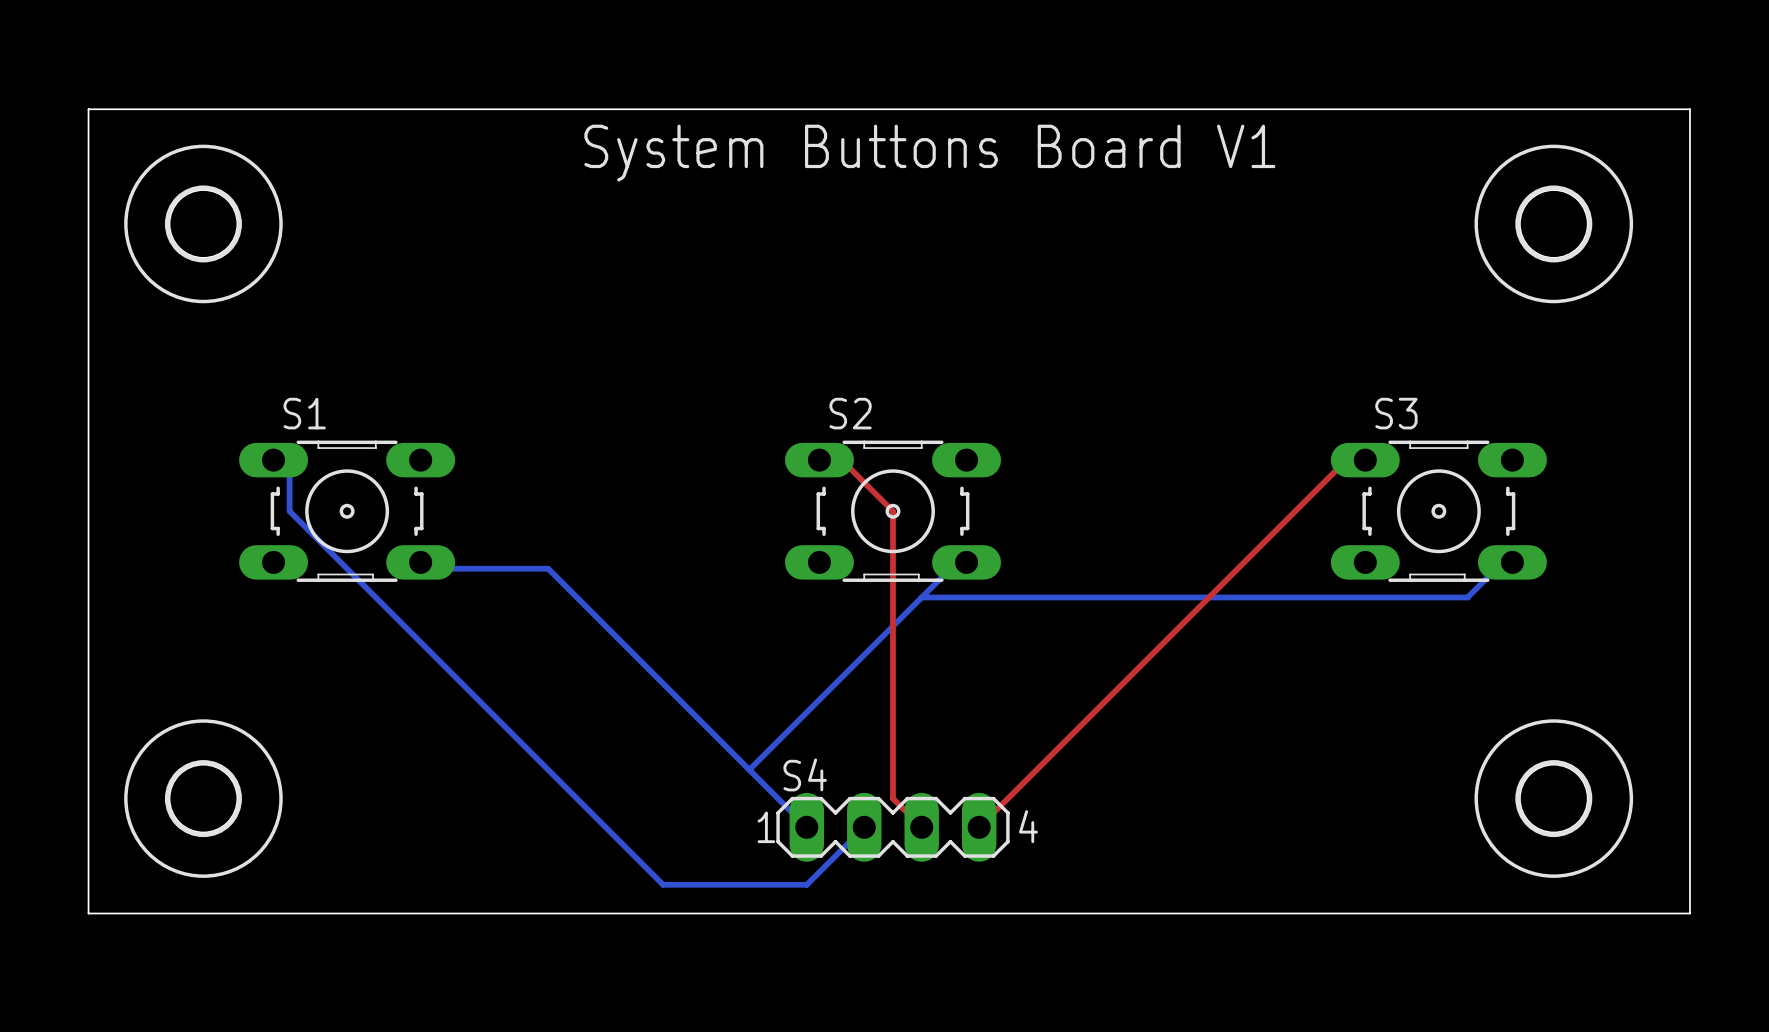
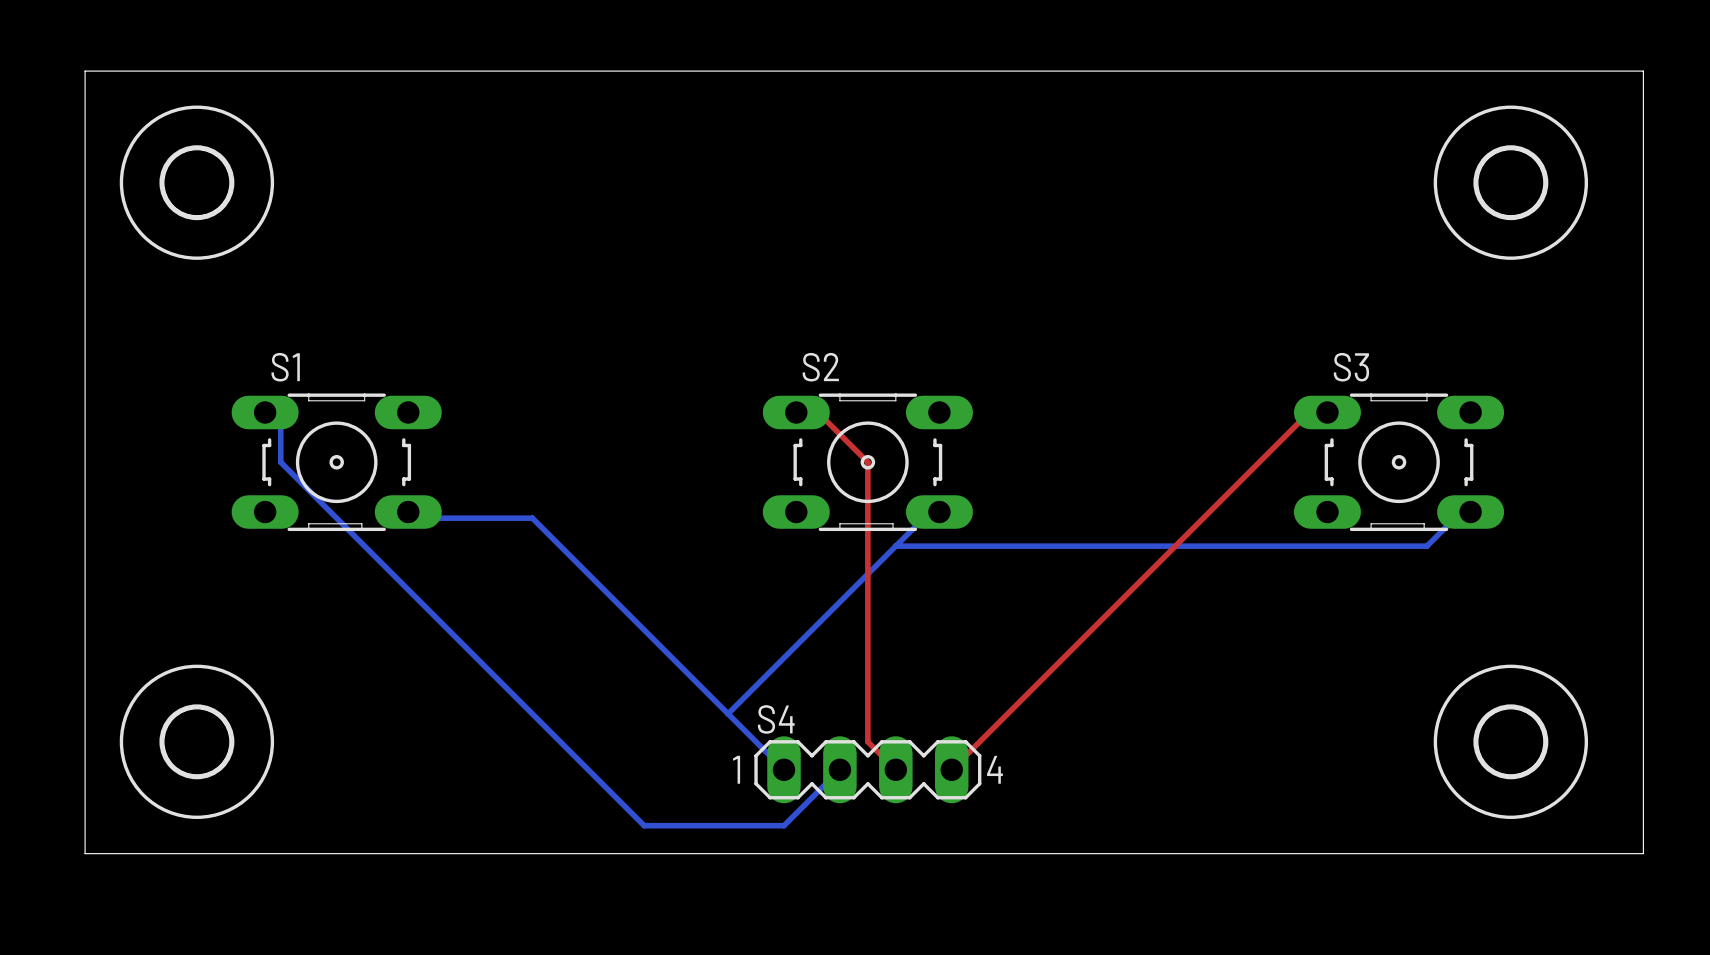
text: System Buttons Board V1 (929, 153) -> none

